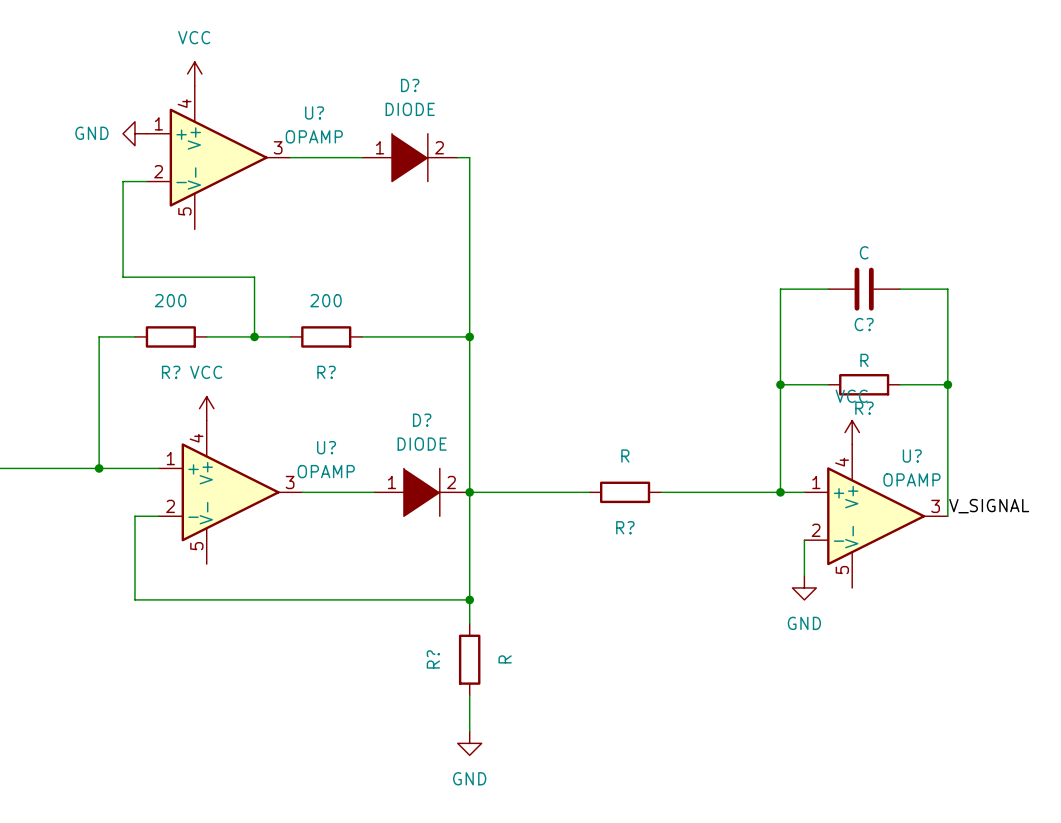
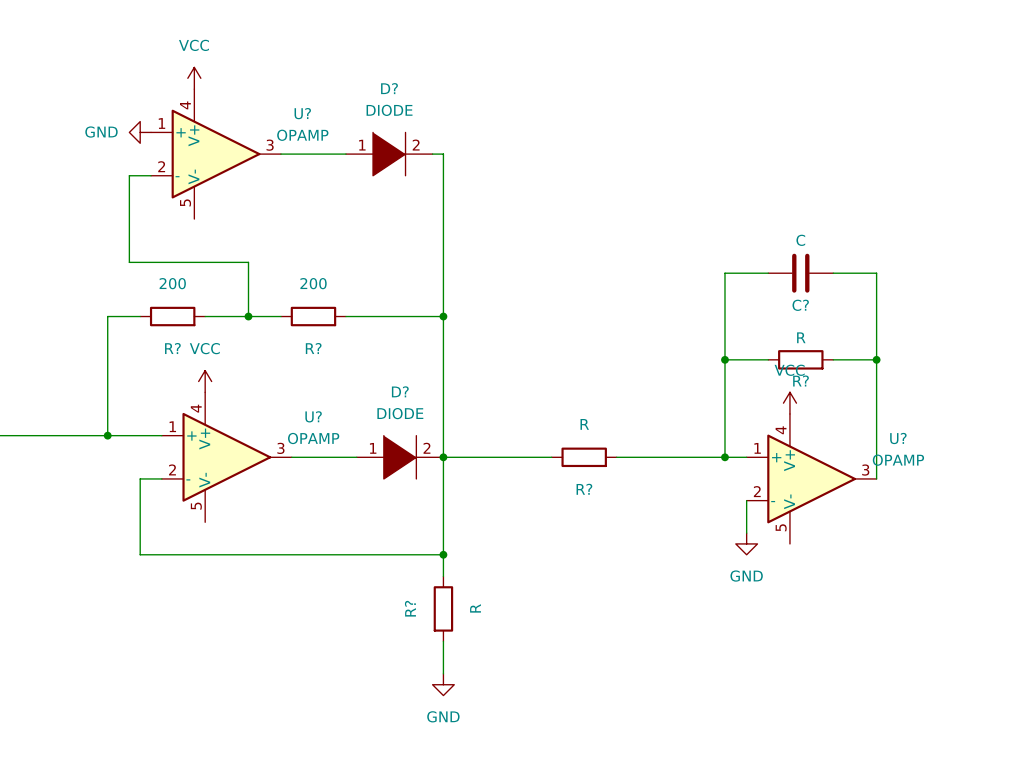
U? name position: U? (912, 456) -> U? (898, 438)
U? value position: OPAMP (911, 479) -> OPAMP (898, 460)
label: V_SIGNAL (989, 506) -> none

